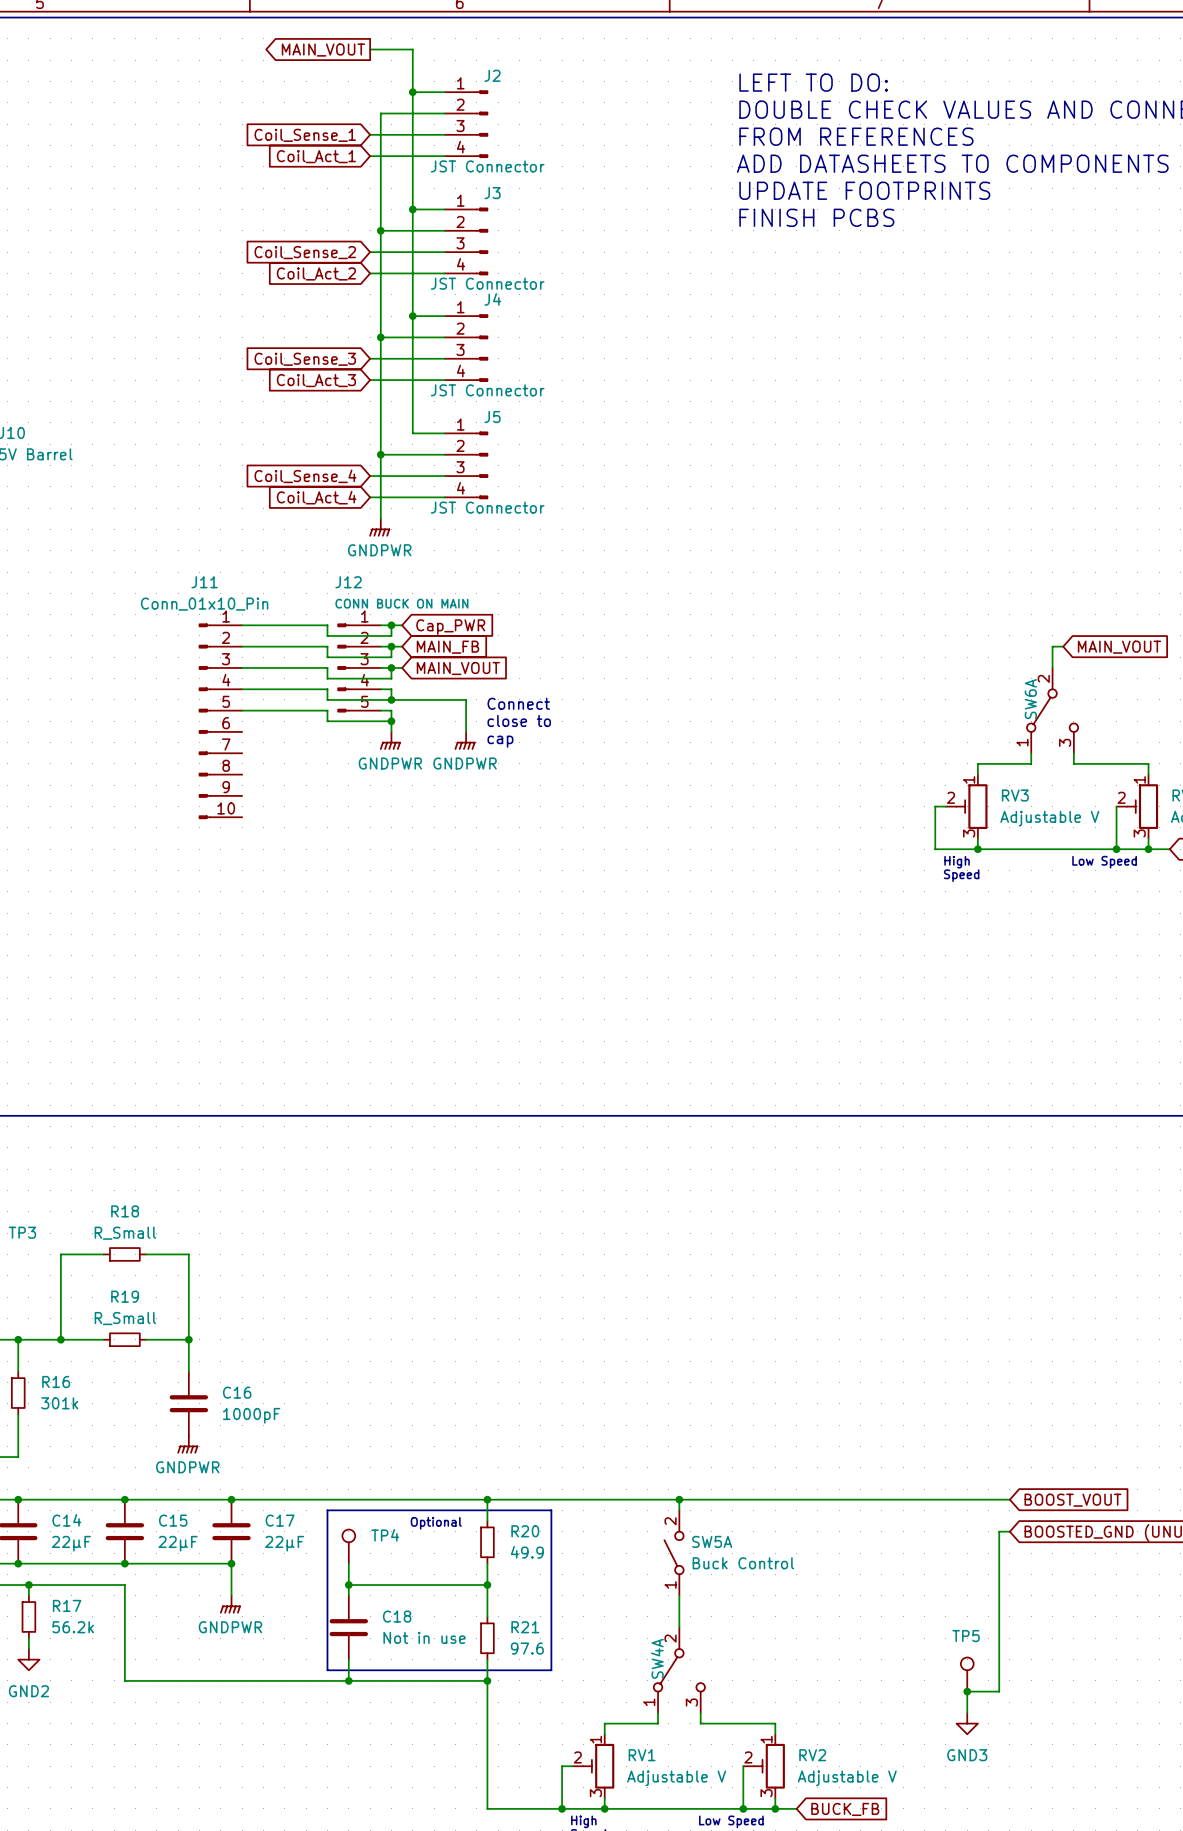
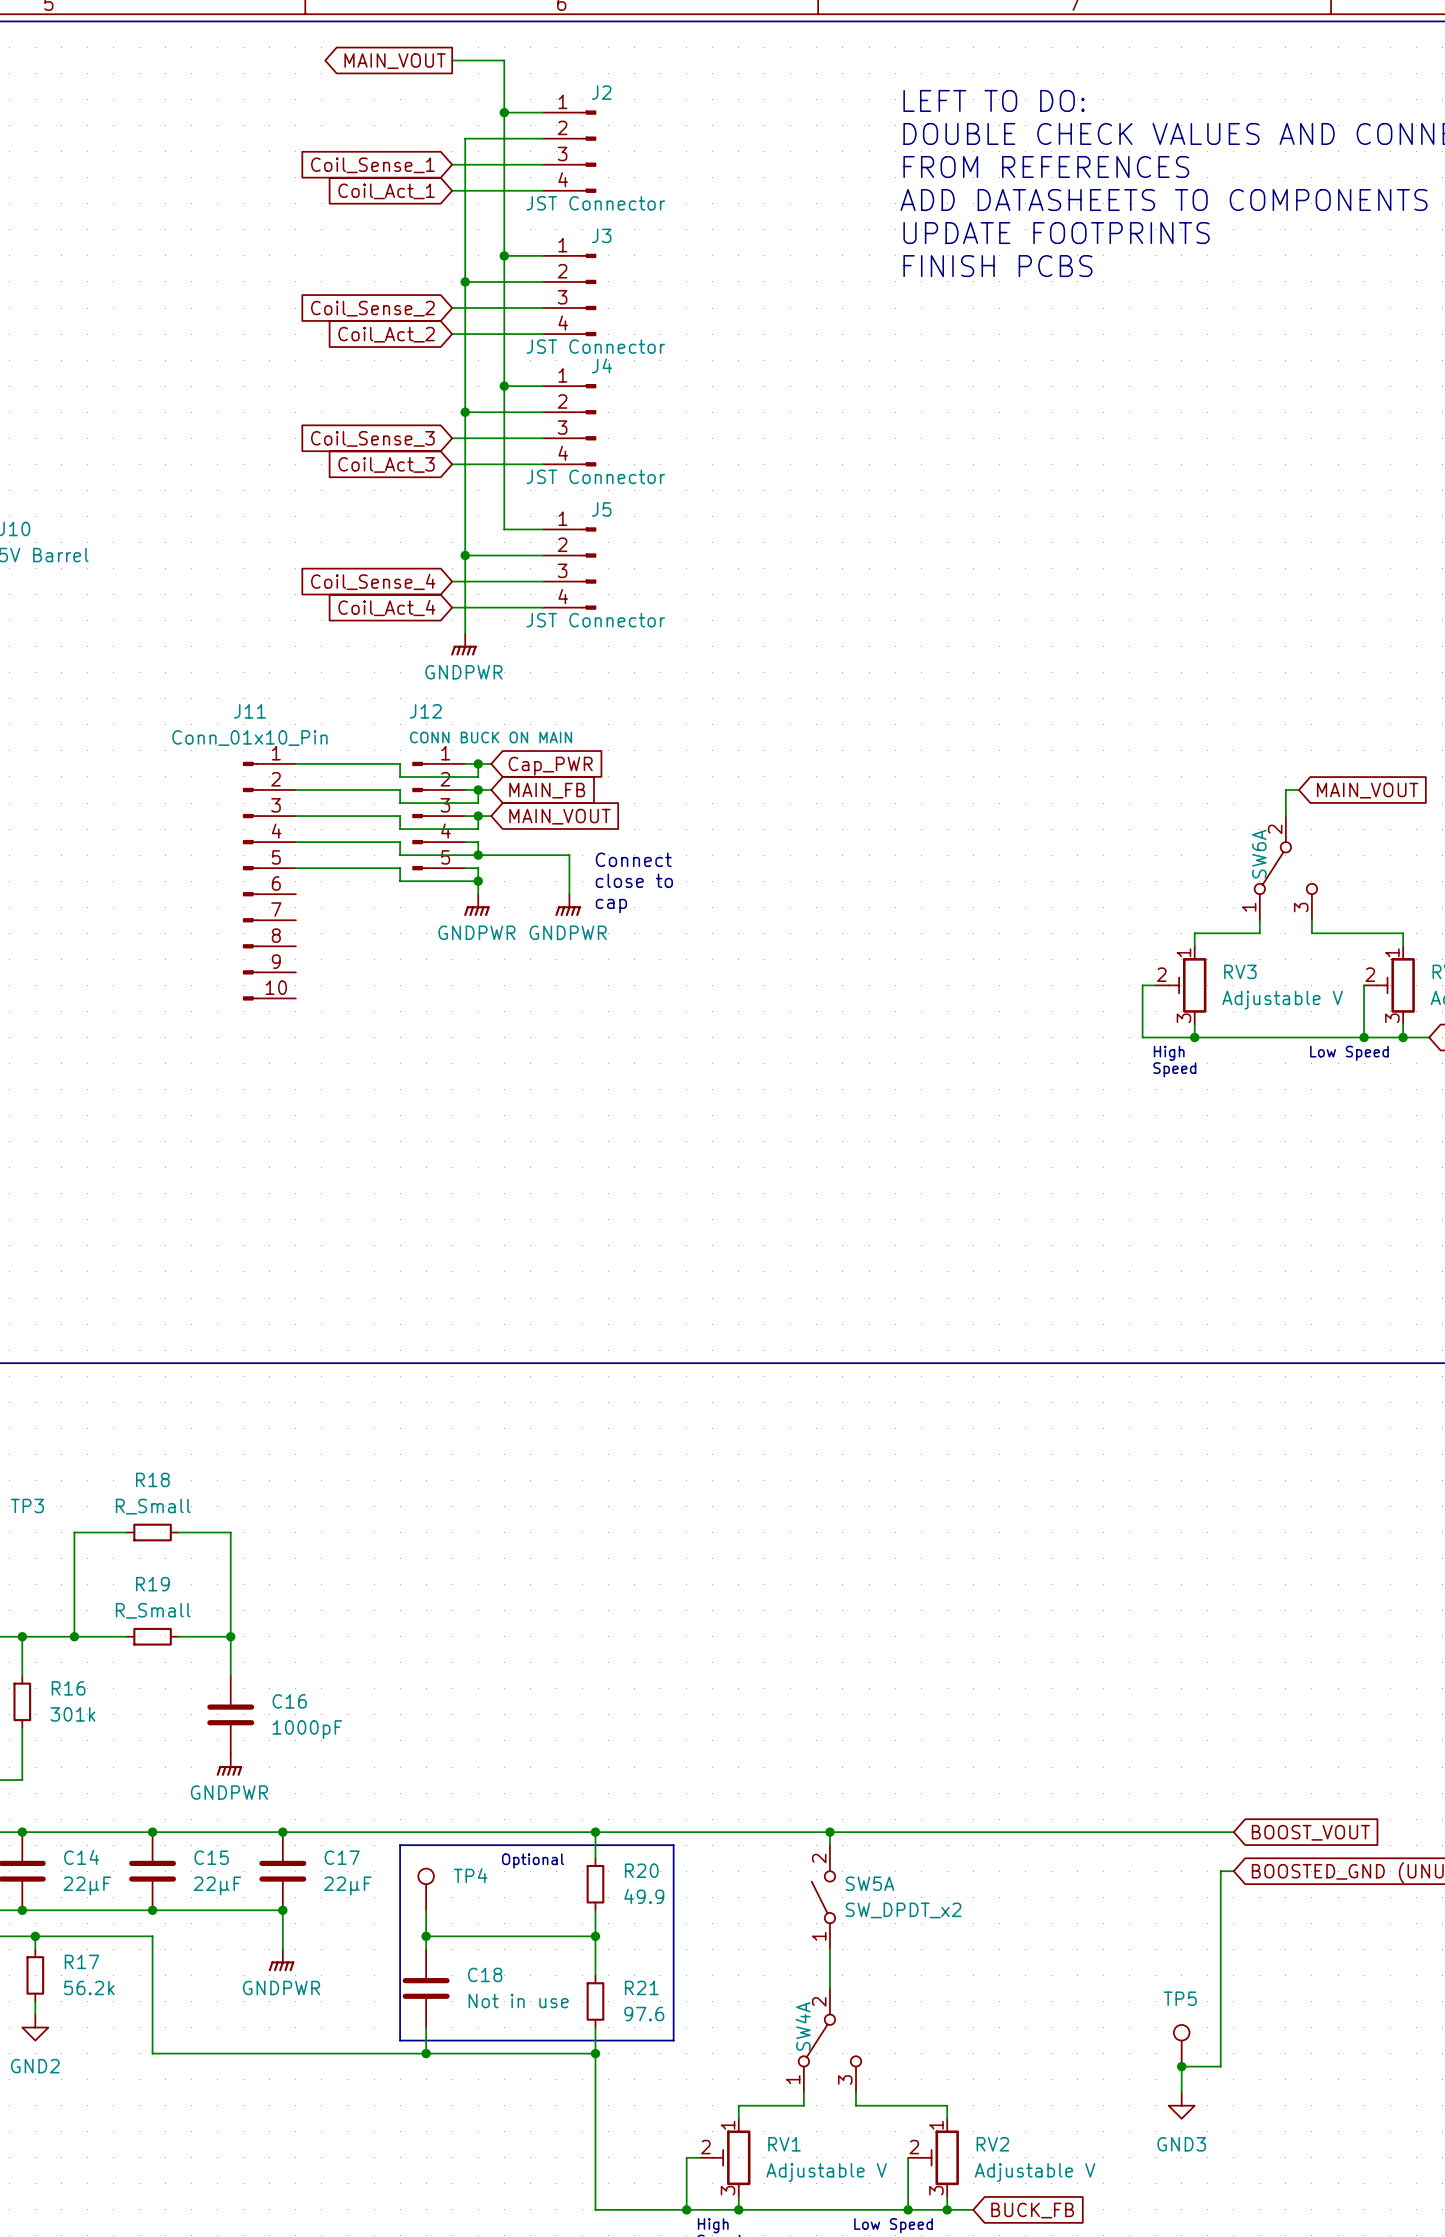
SW5A value: Buck Control (743, 1563) -> SW_DPDT_x2 (903, 1910)

